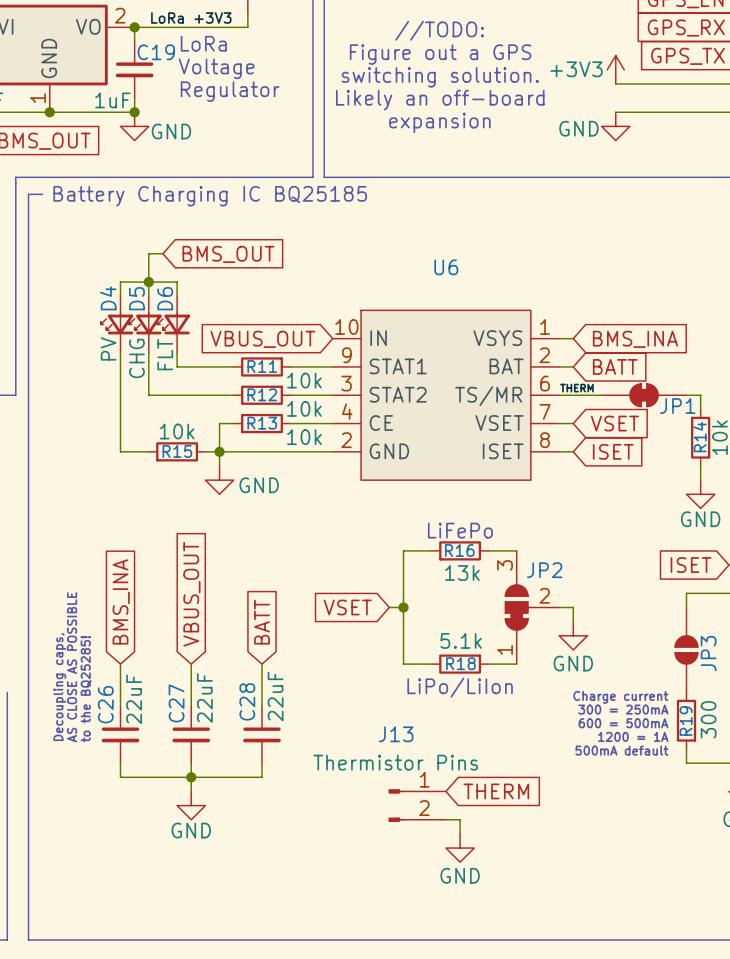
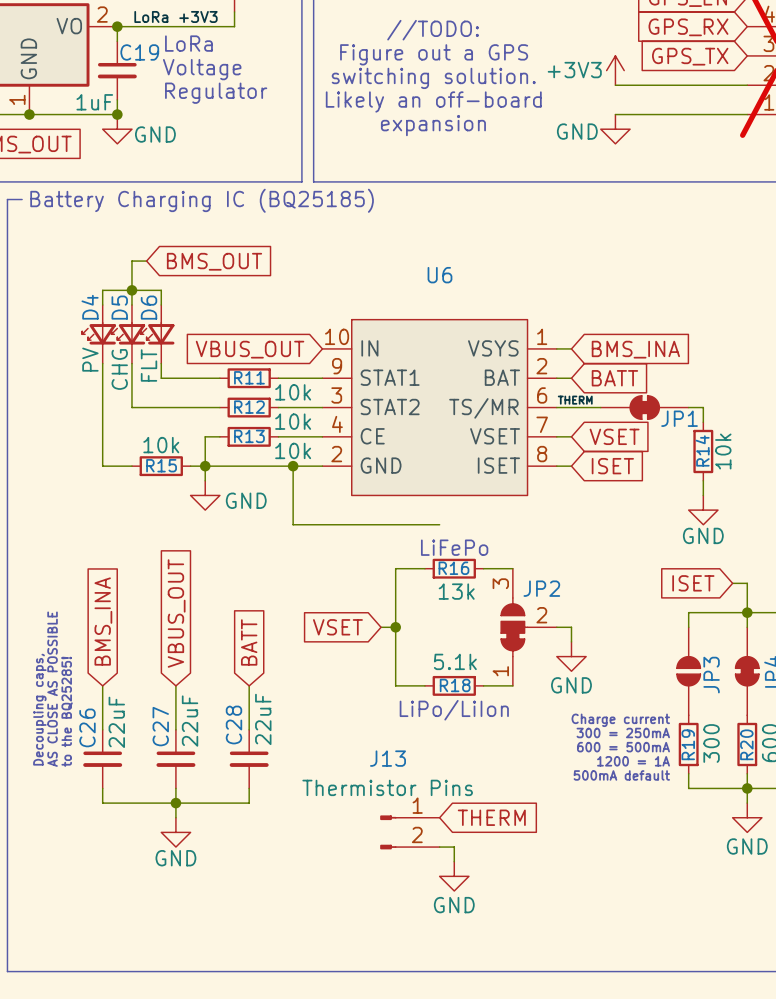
text: Battery Charging IC BQ25185 (210, 196) -> Battery Charging IC (BQ25185) (202, 200)
wire: none -> (293, 466) (293, 524) (439, 524)
junction: none -> (293, 466)

